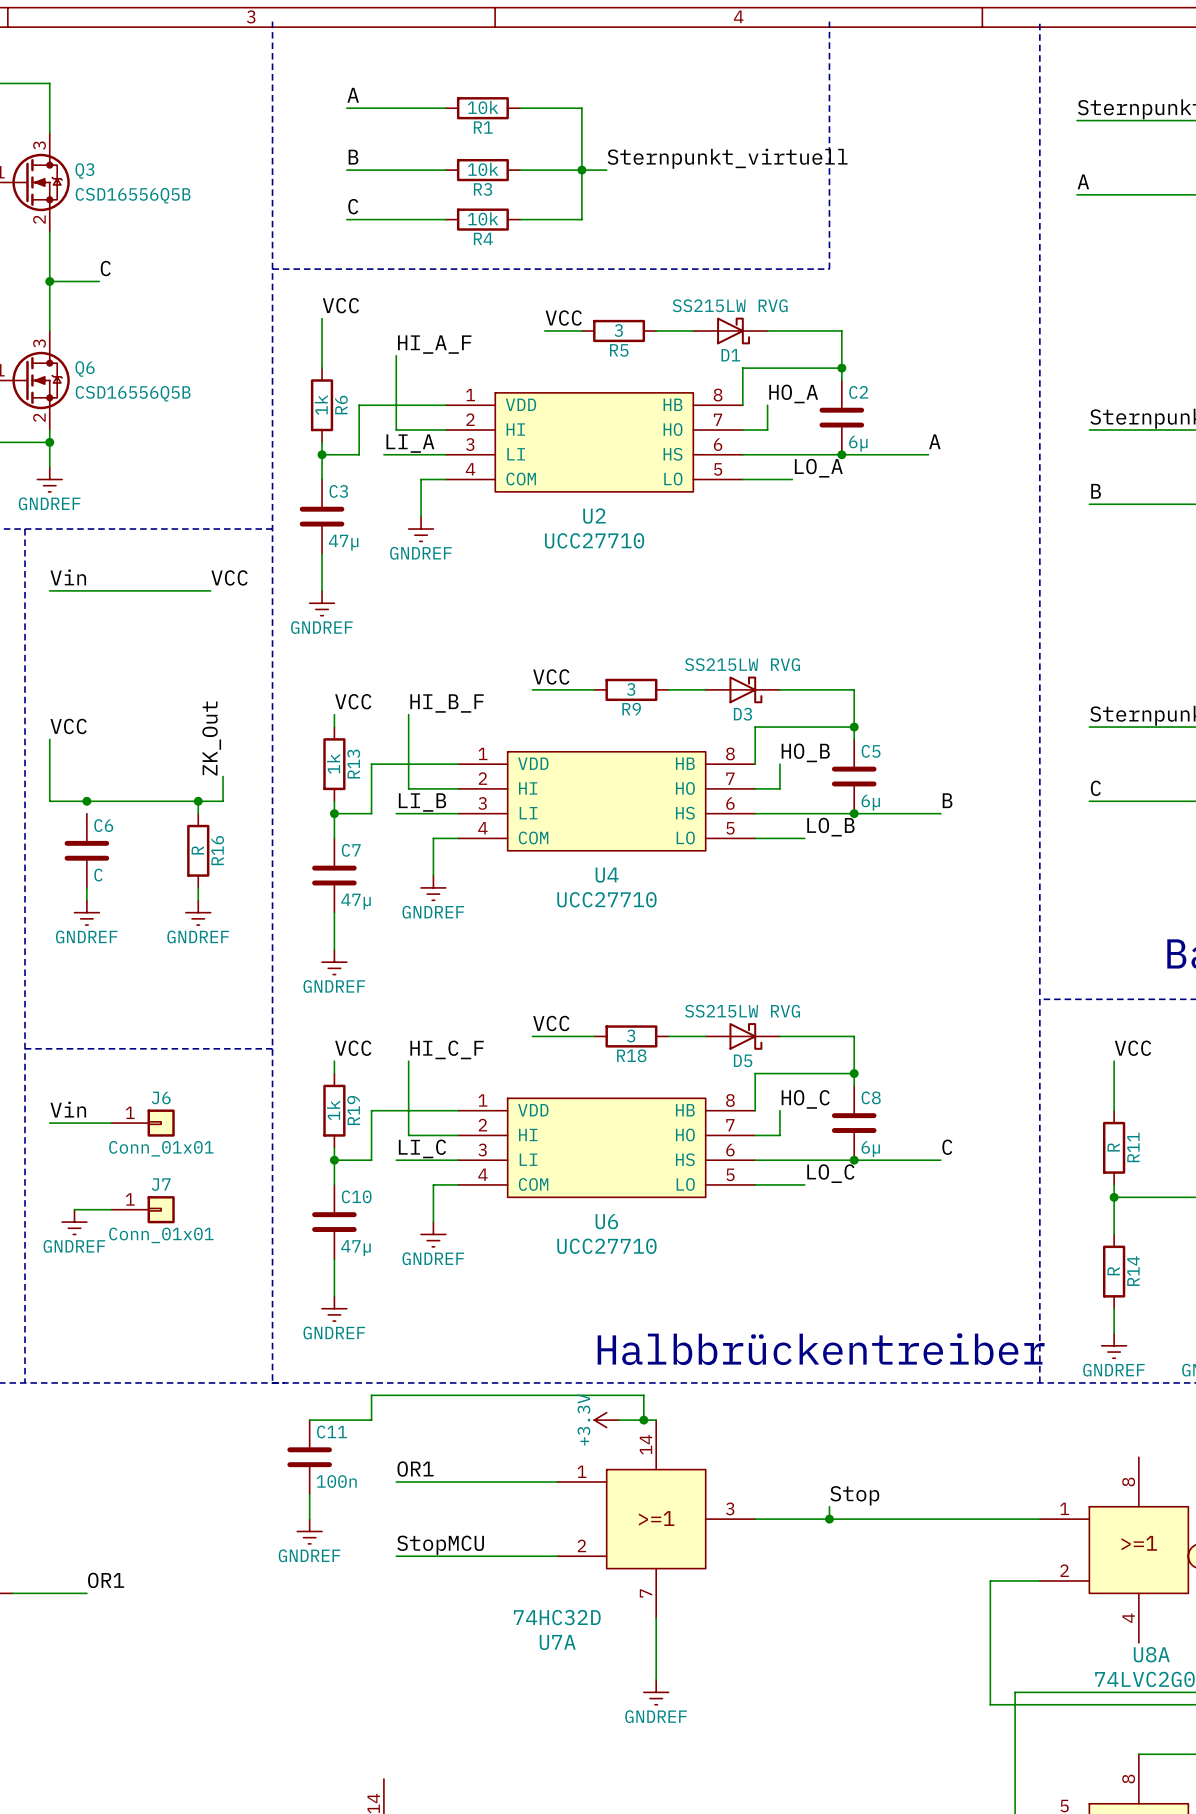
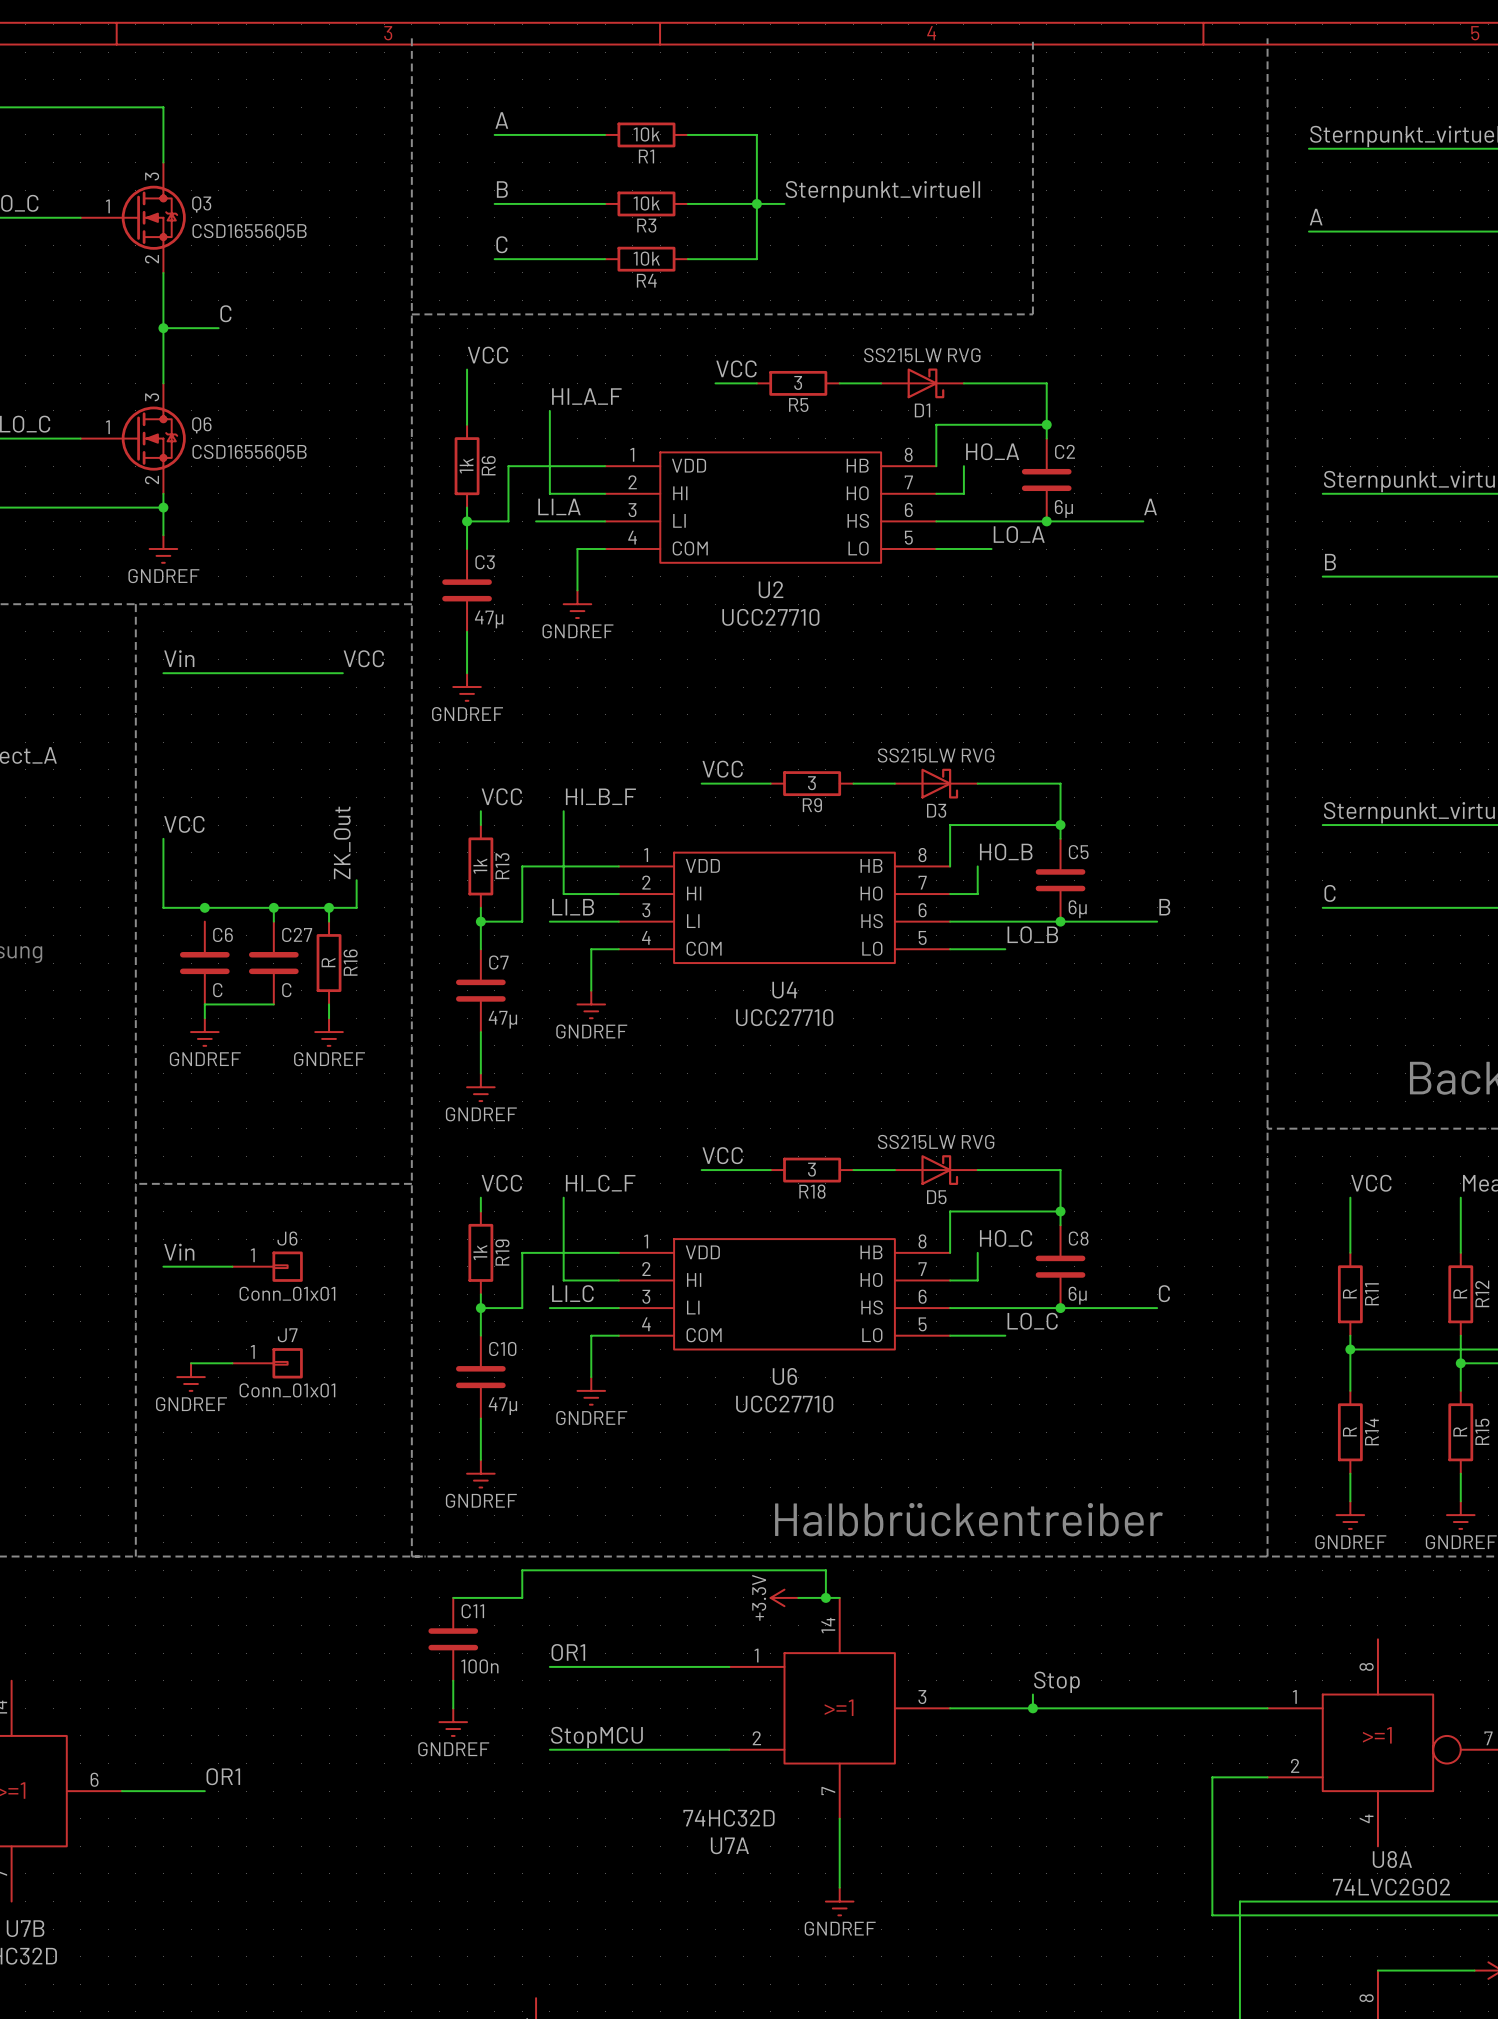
wire: none -> (273, 907) (273, 921)
junction: none -> (273, 907)
C27: none -> C (273, 963)
wire: none -> (204, 1004) (273, 1004)

